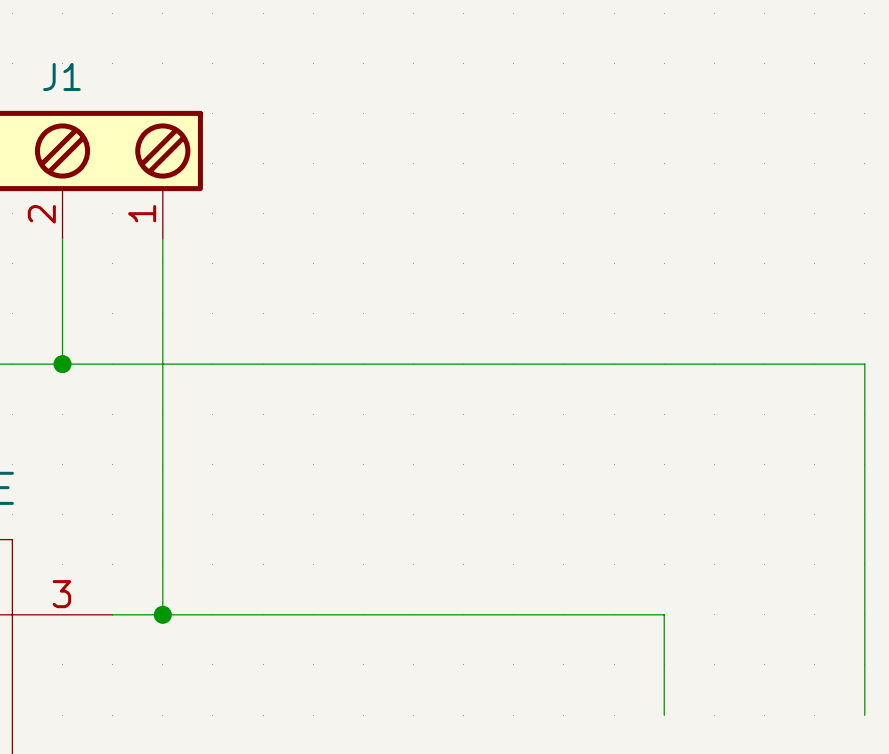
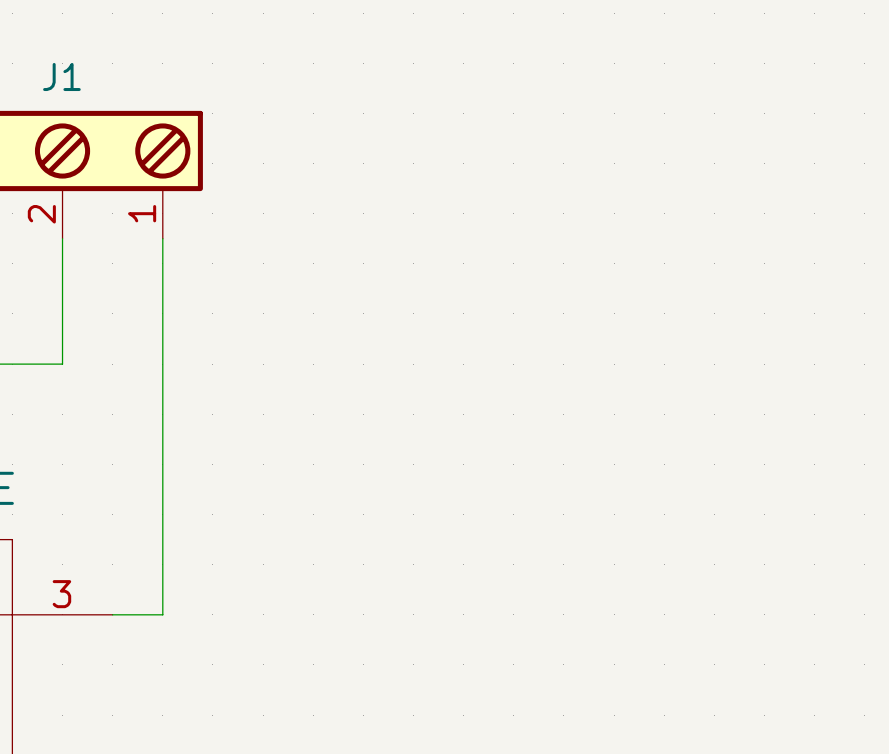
wire: (62, 364) (864, 364) (864, 715) -> none
junction: (62, 364) -> none
wire: (162, 614) (664, 614) (664, 715) -> none
junction: (162, 614) -> none

